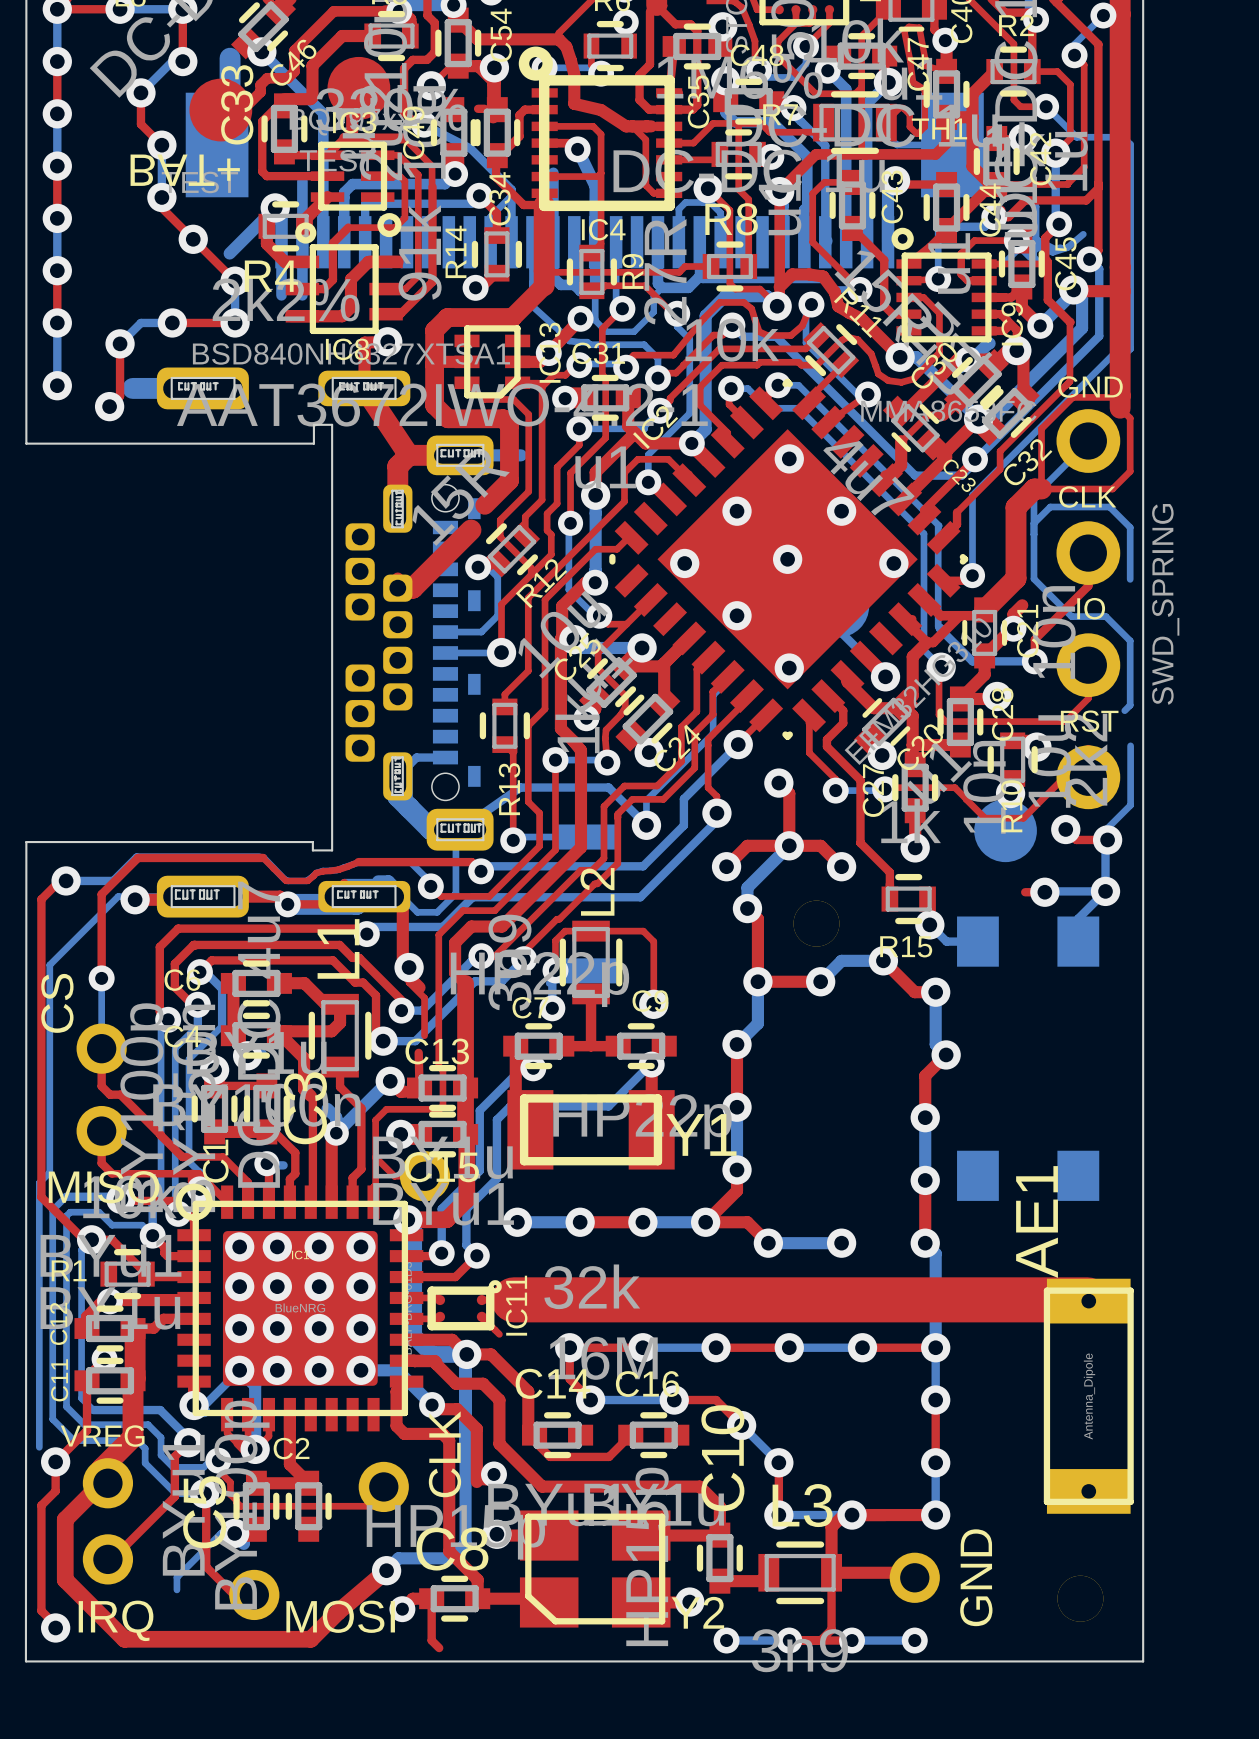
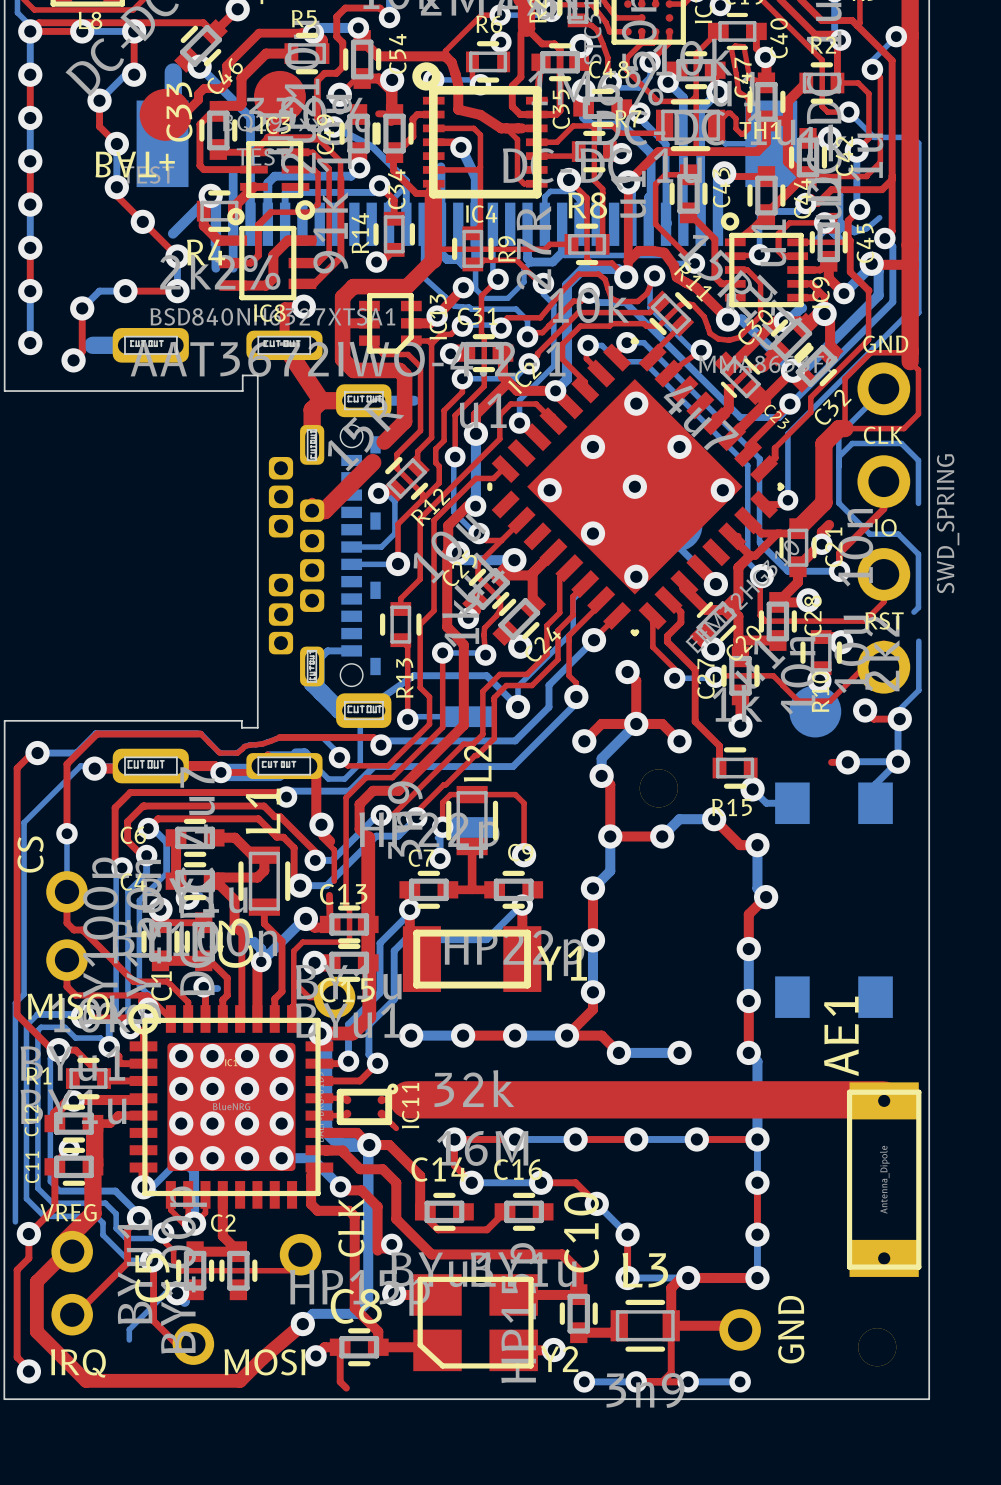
via position: (533, 1068) -> (409, 909)

